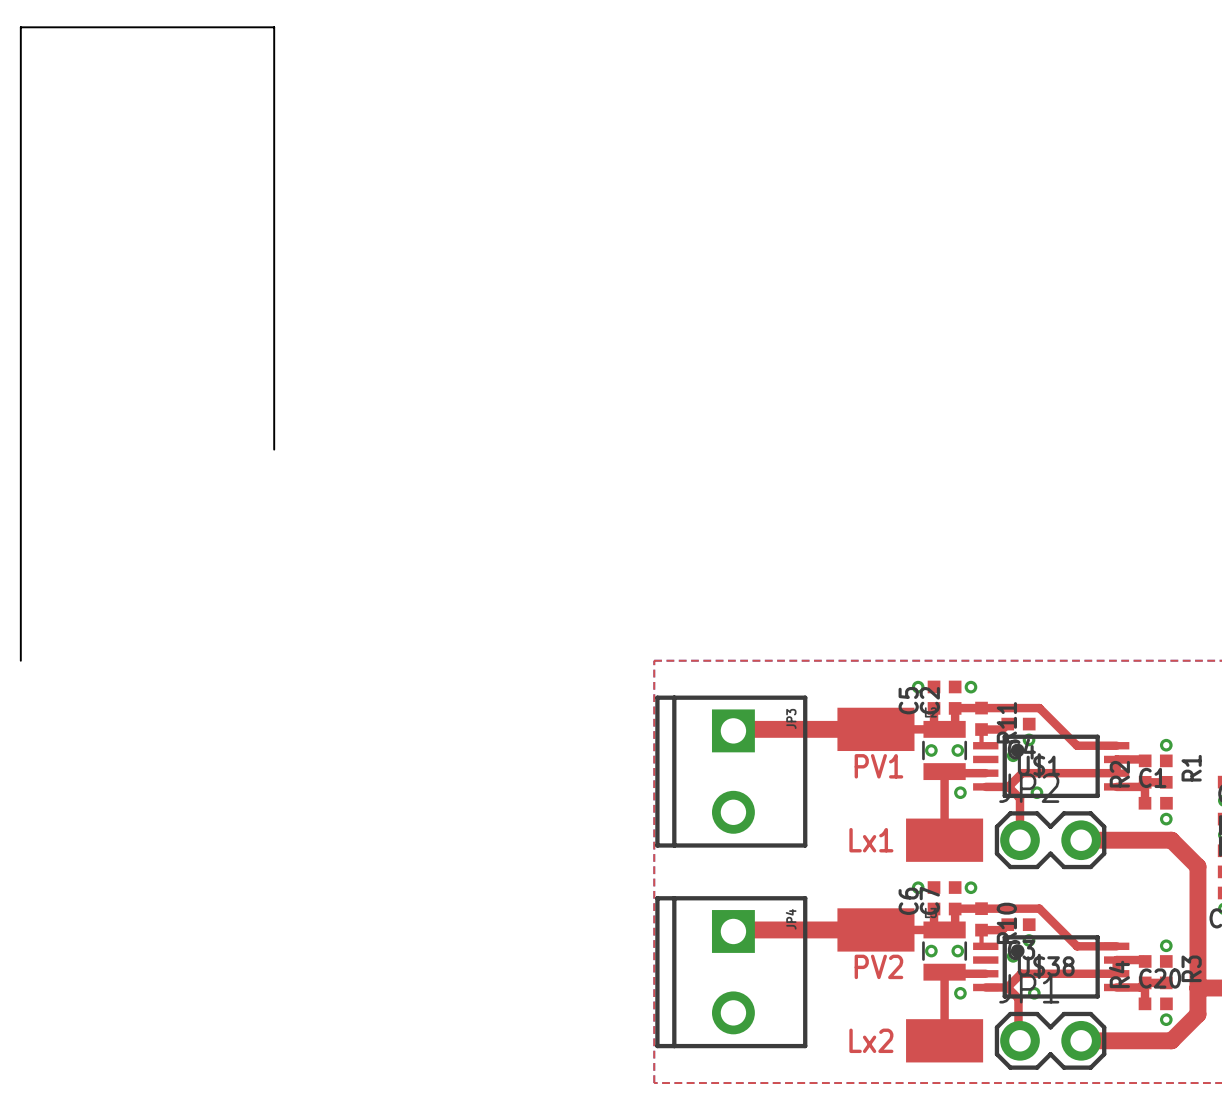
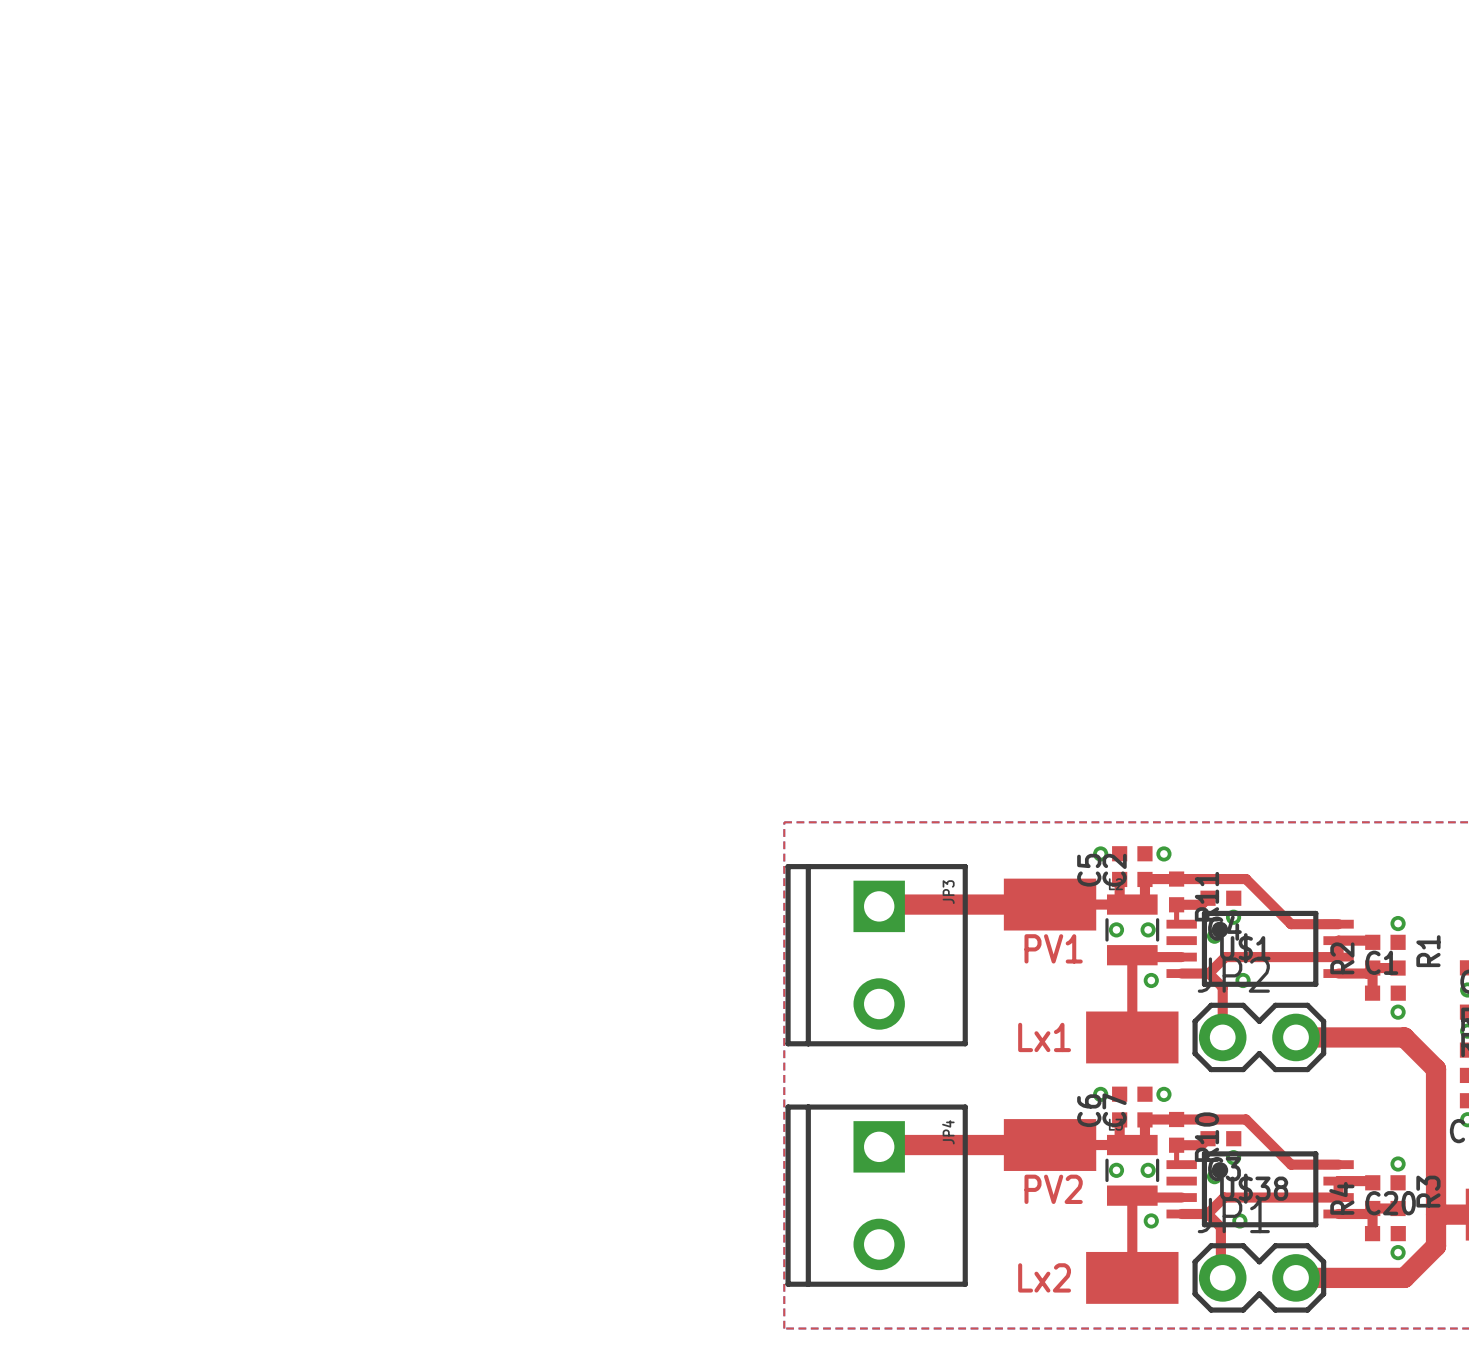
board edge: (274, 449) (274, 27) (20, 27) (20, 660) -> none

